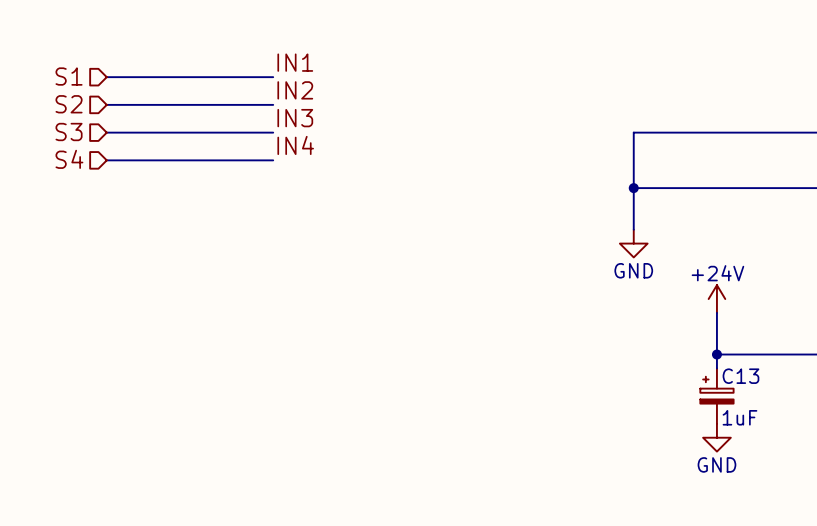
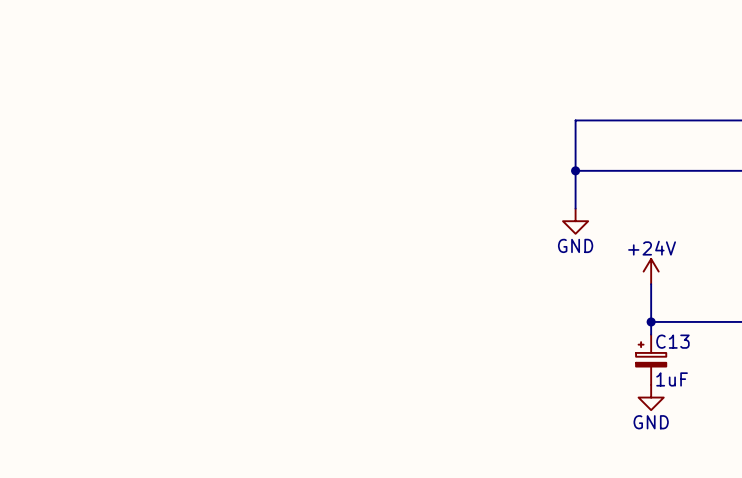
label: IN1 (295, 62) -> none
hierarchical label: S1 (69, 76) -> none
wire: (106, 77) (273, 77) -> none
label: IN2 (295, 90) -> none
hierarchical label: S2 (69, 104) -> none
wire: (106, 104) (273, 104) -> none
label: IN3 (295, 118) -> none
hierarchical label: S3 (69, 132) -> none
wire: (106, 132) (273, 132) -> none
label: IN4 (295, 145) -> none
hierarchical label: S4 (69, 159) -> none
wire: (106, 160) (273, 160) -> none

